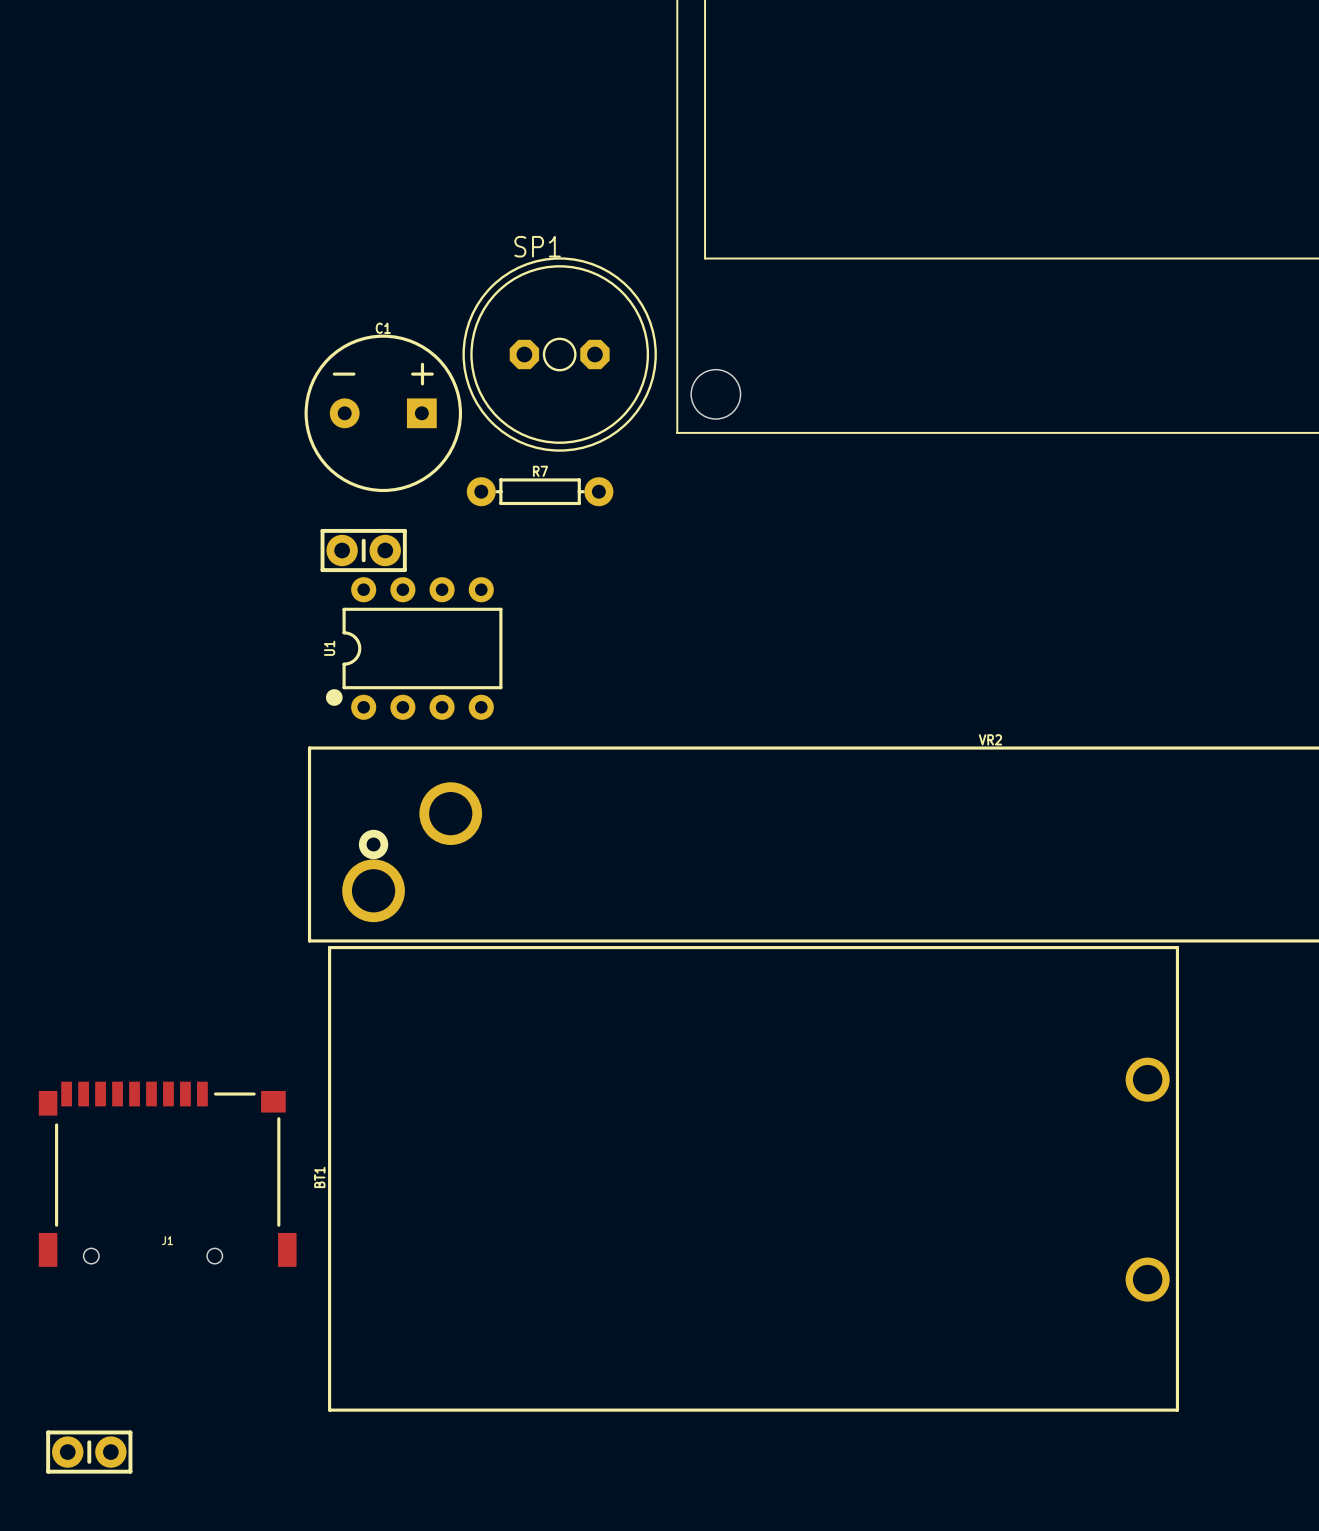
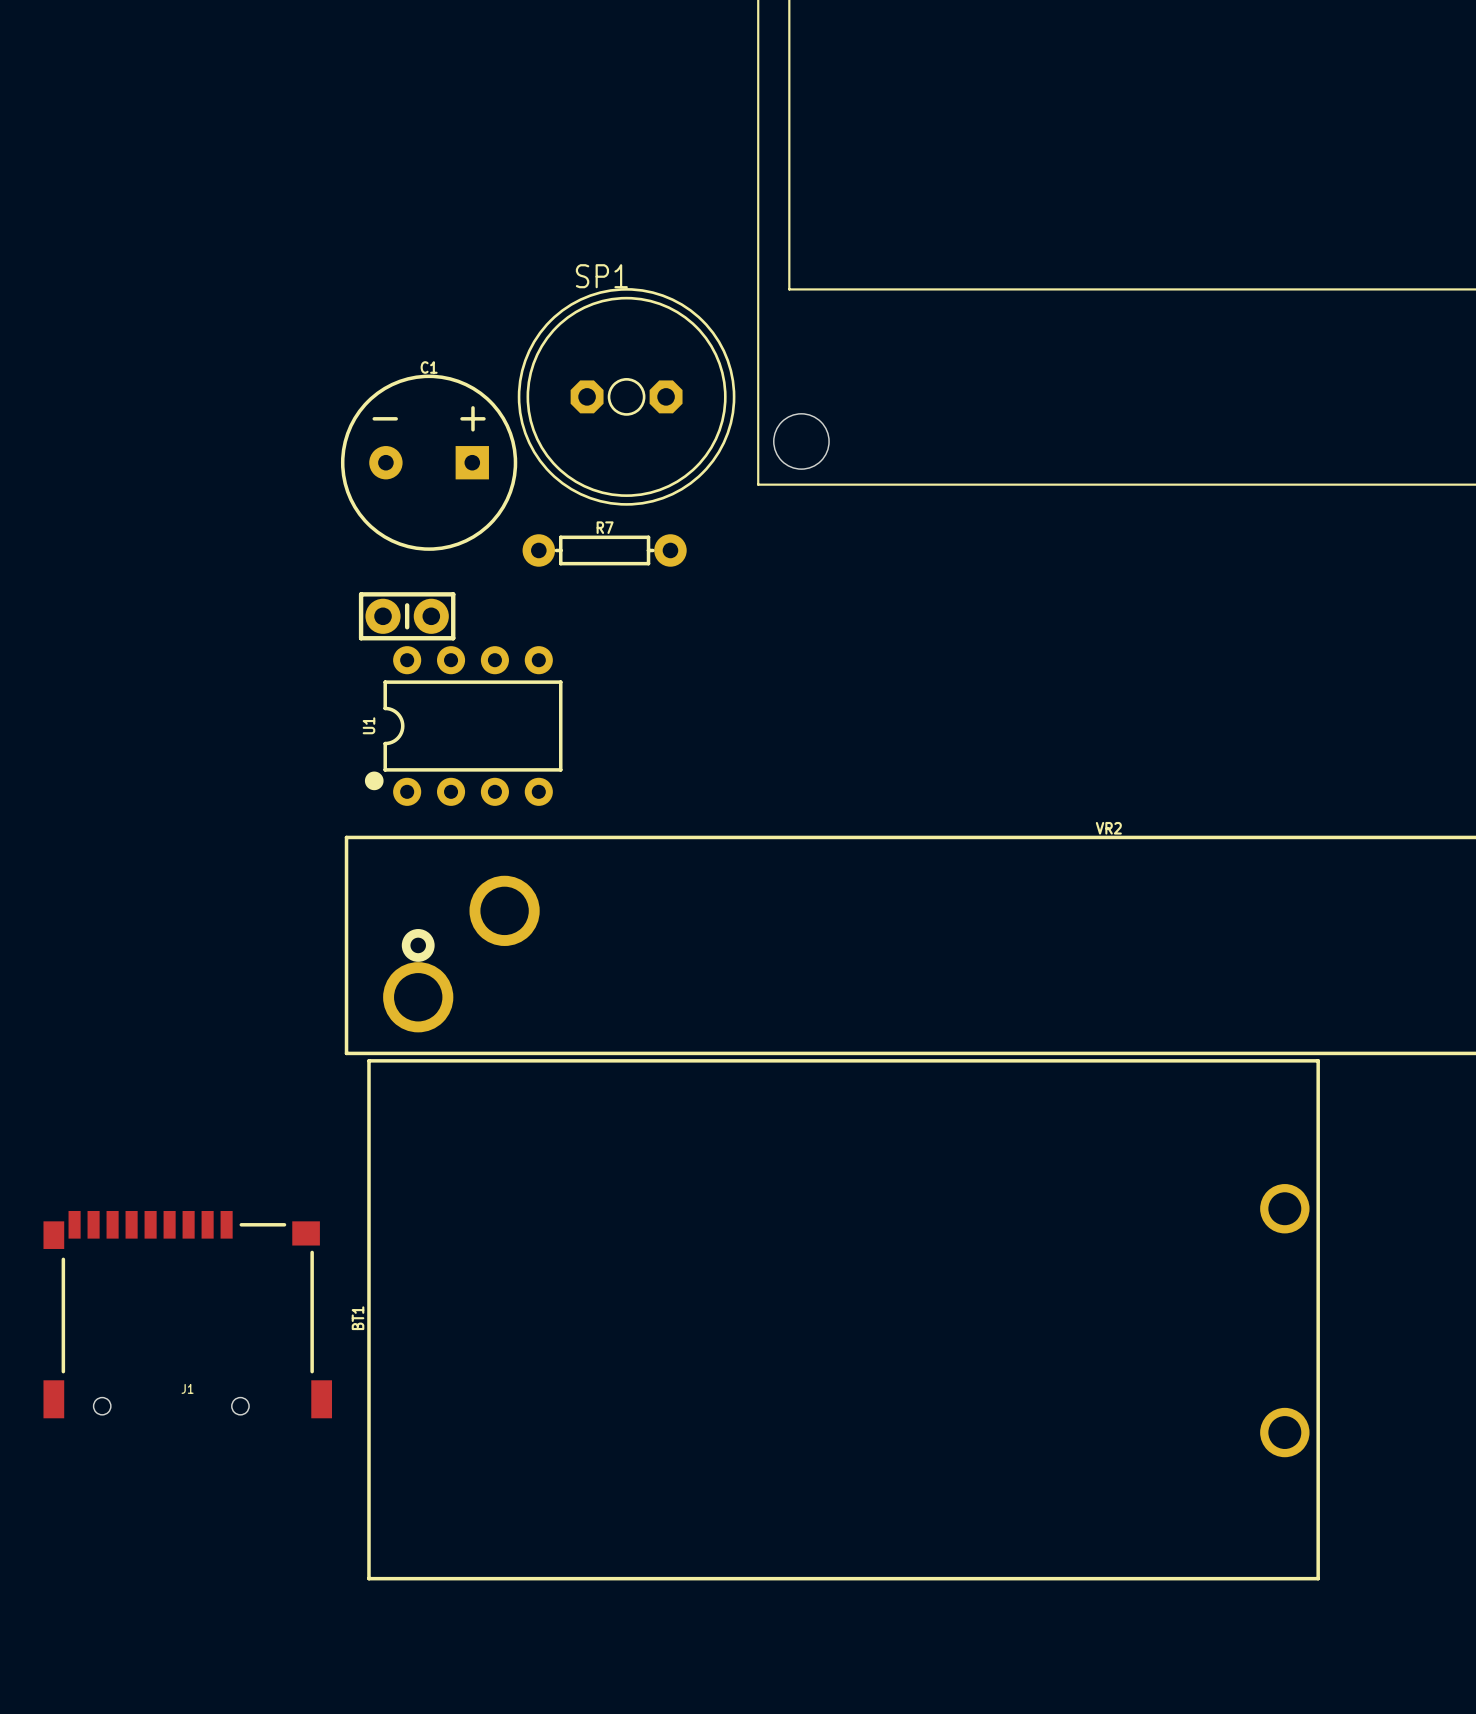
part: (89, 1452) -> none

